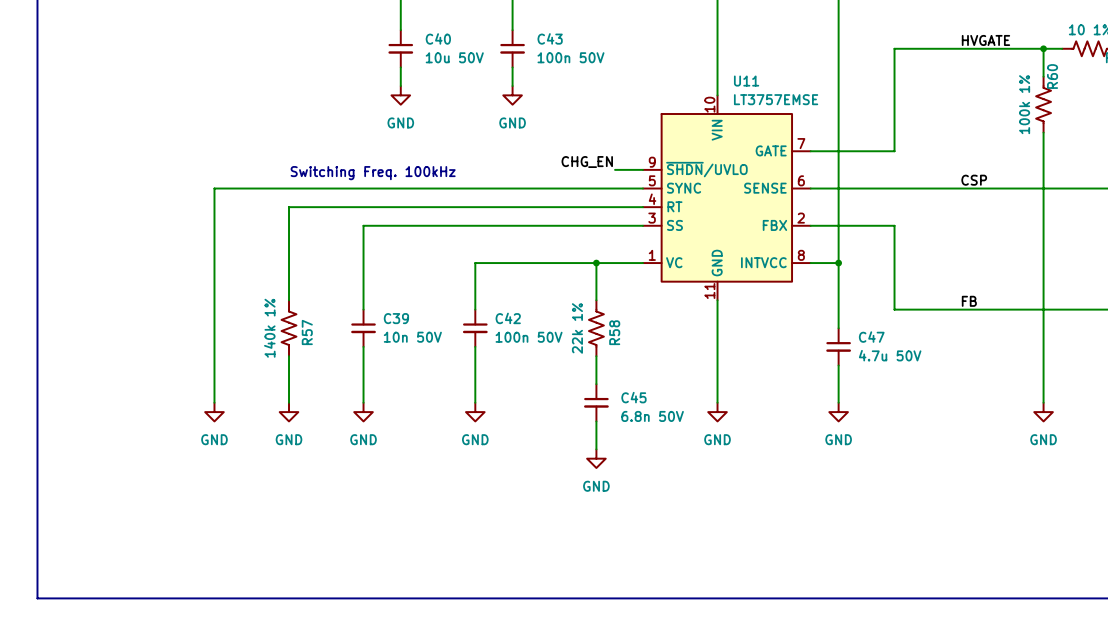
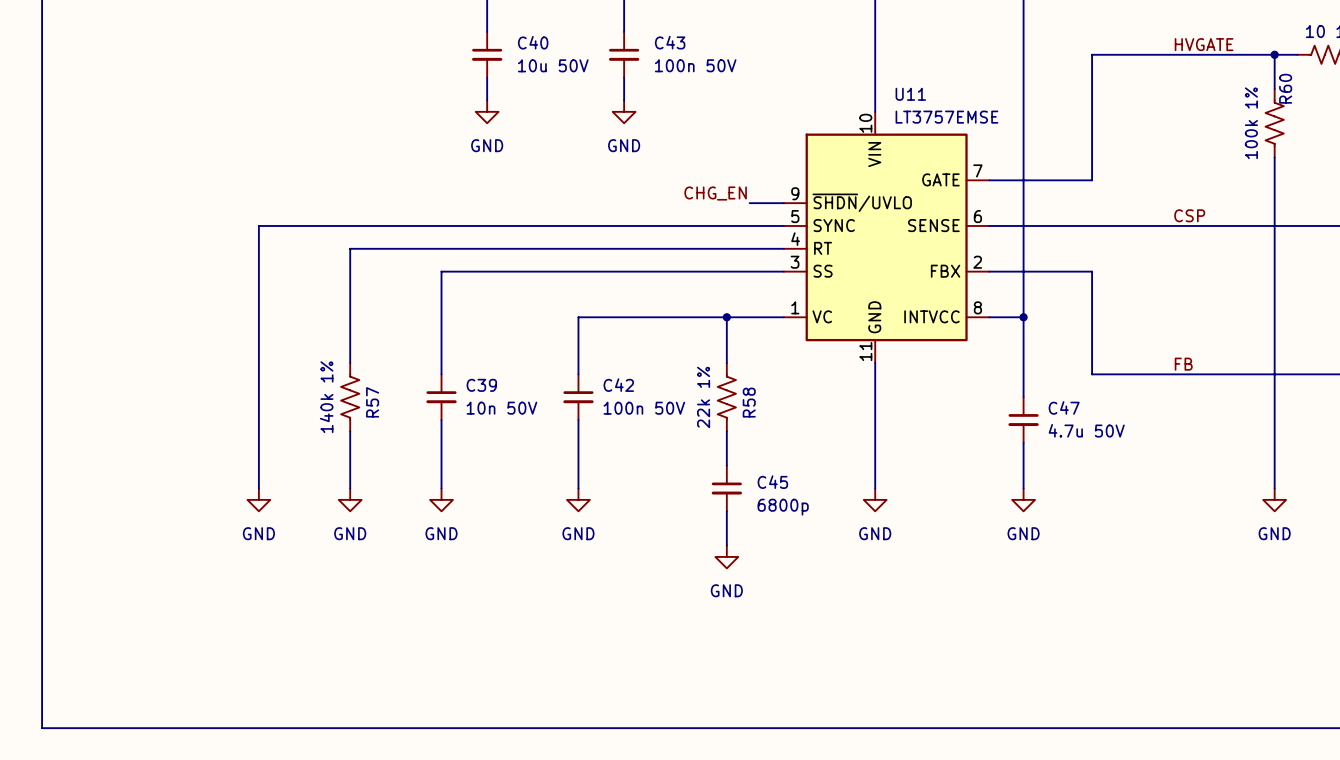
text: Switching Freq. 100kHz (373, 173) -> none
C45 value: 6.8n 50V (652, 416) -> 6800p (783, 507)

